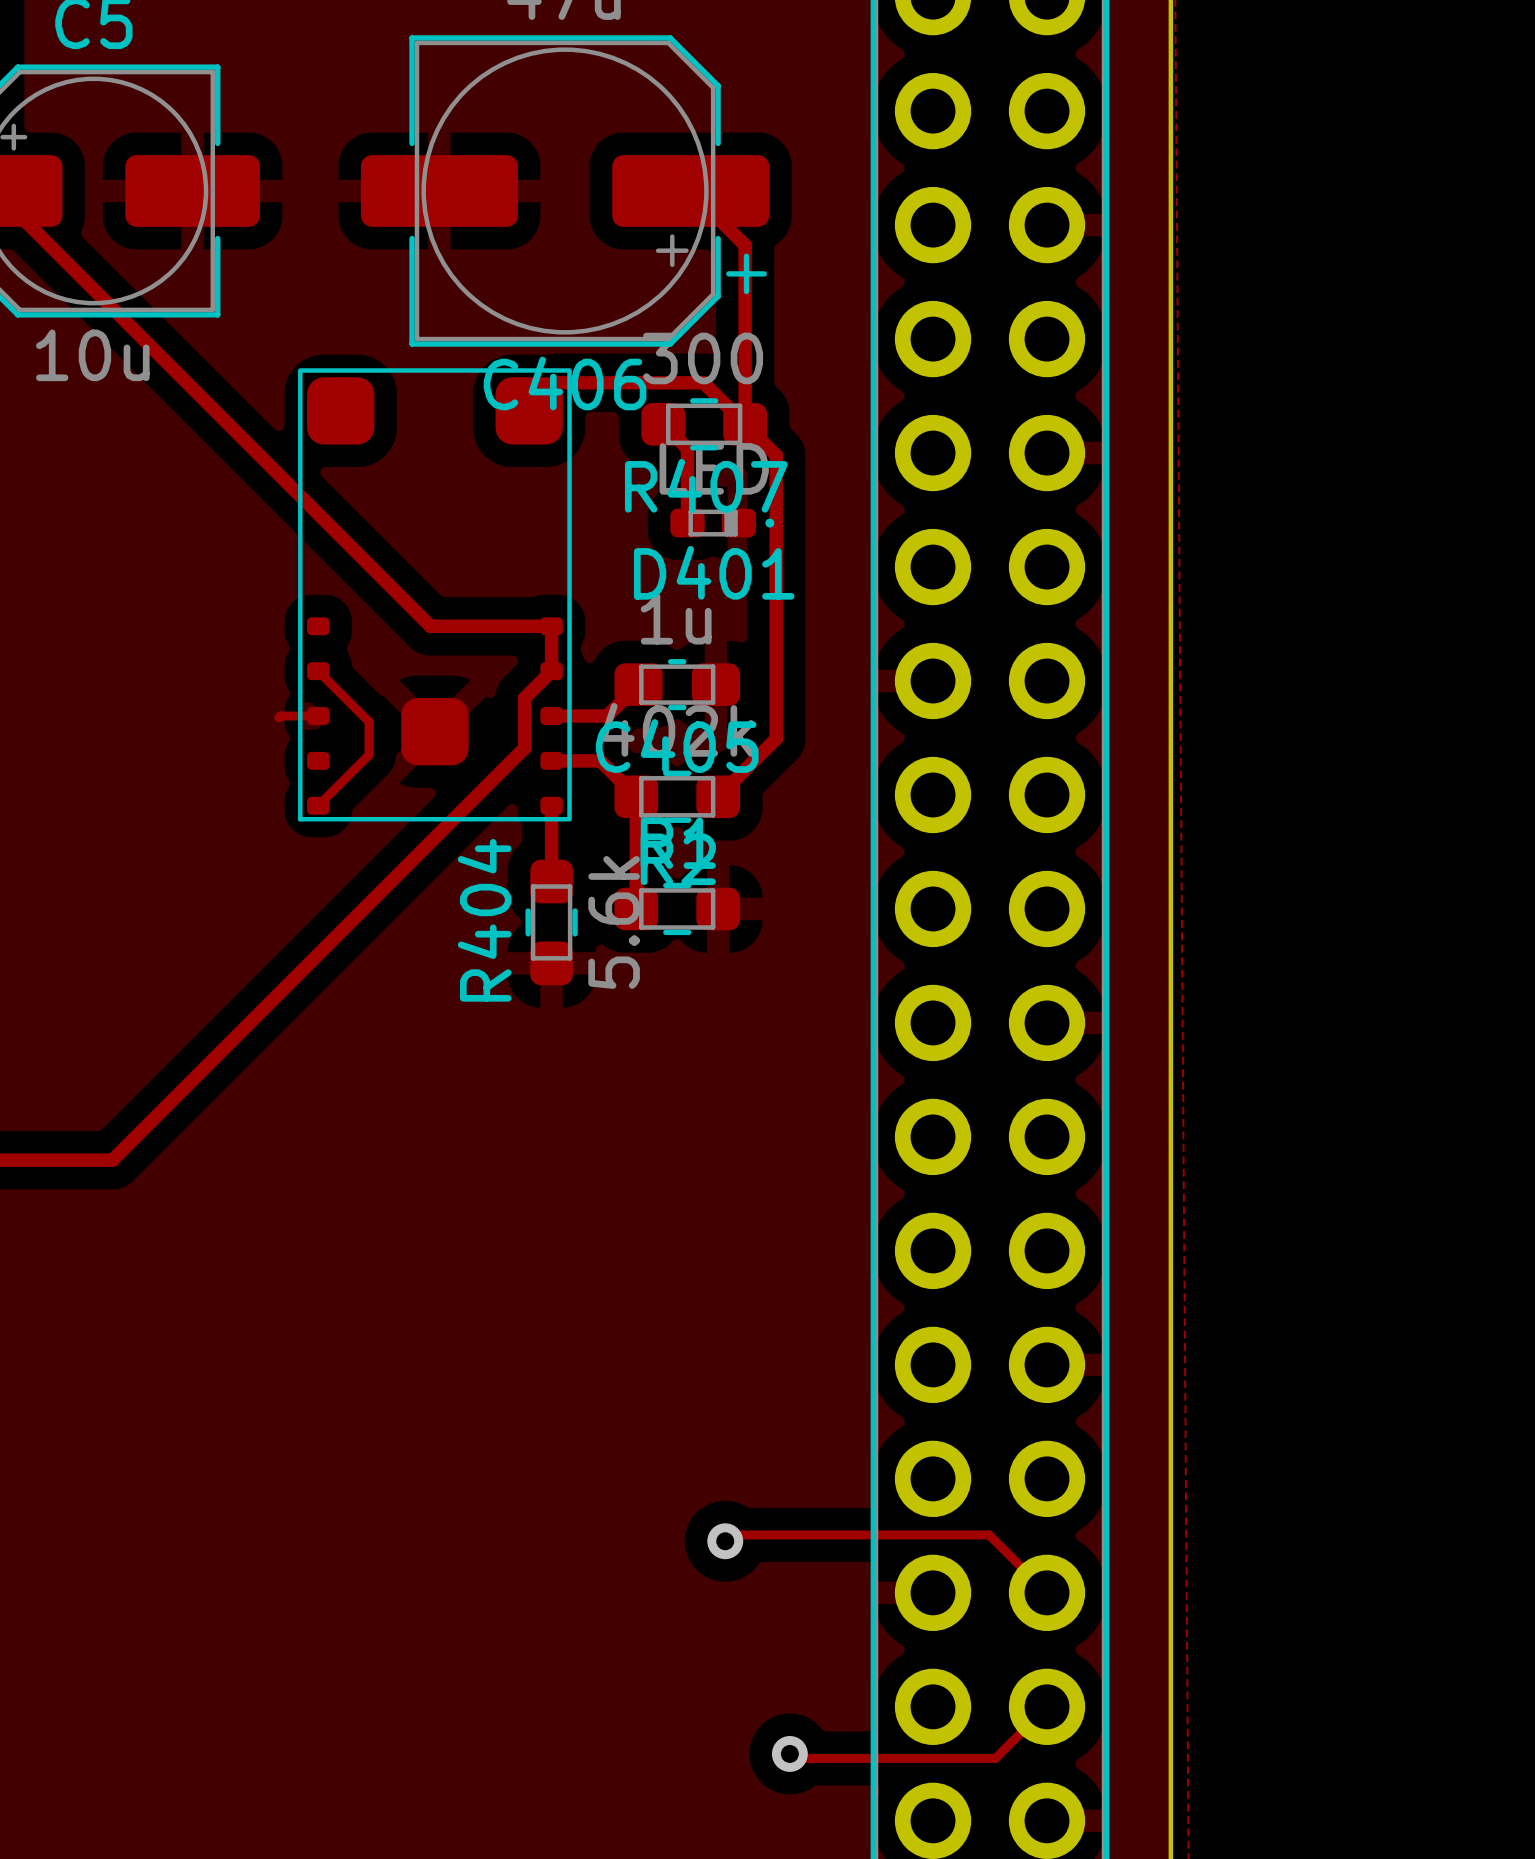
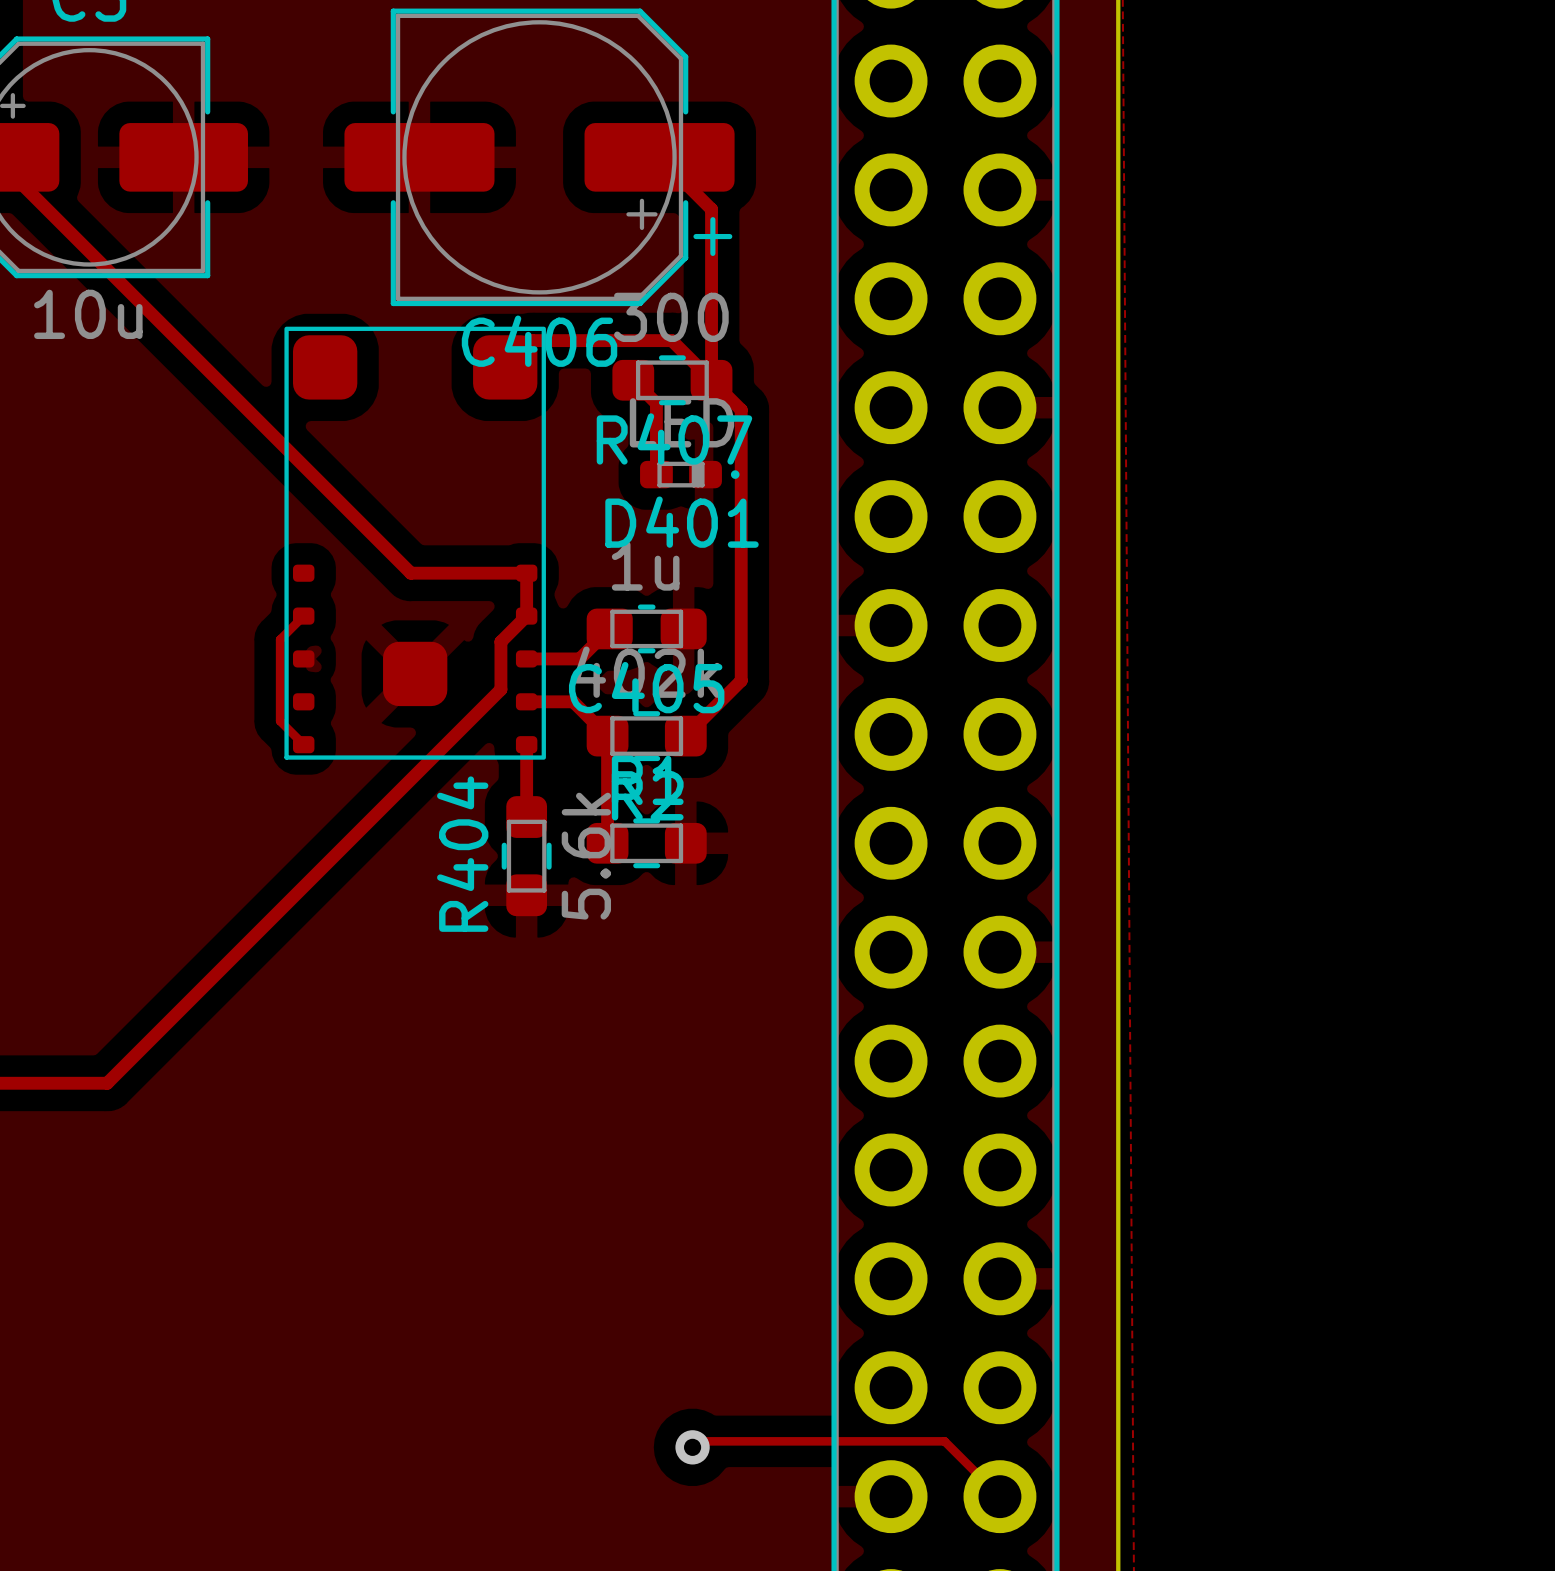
track: (318, 671) (368, 721) (368, 755) (318, 805) -> (303, 616) (280, 639) (280, 721) (303, 744)
track: (318, 716) (280, 716) (278, 717) -> none

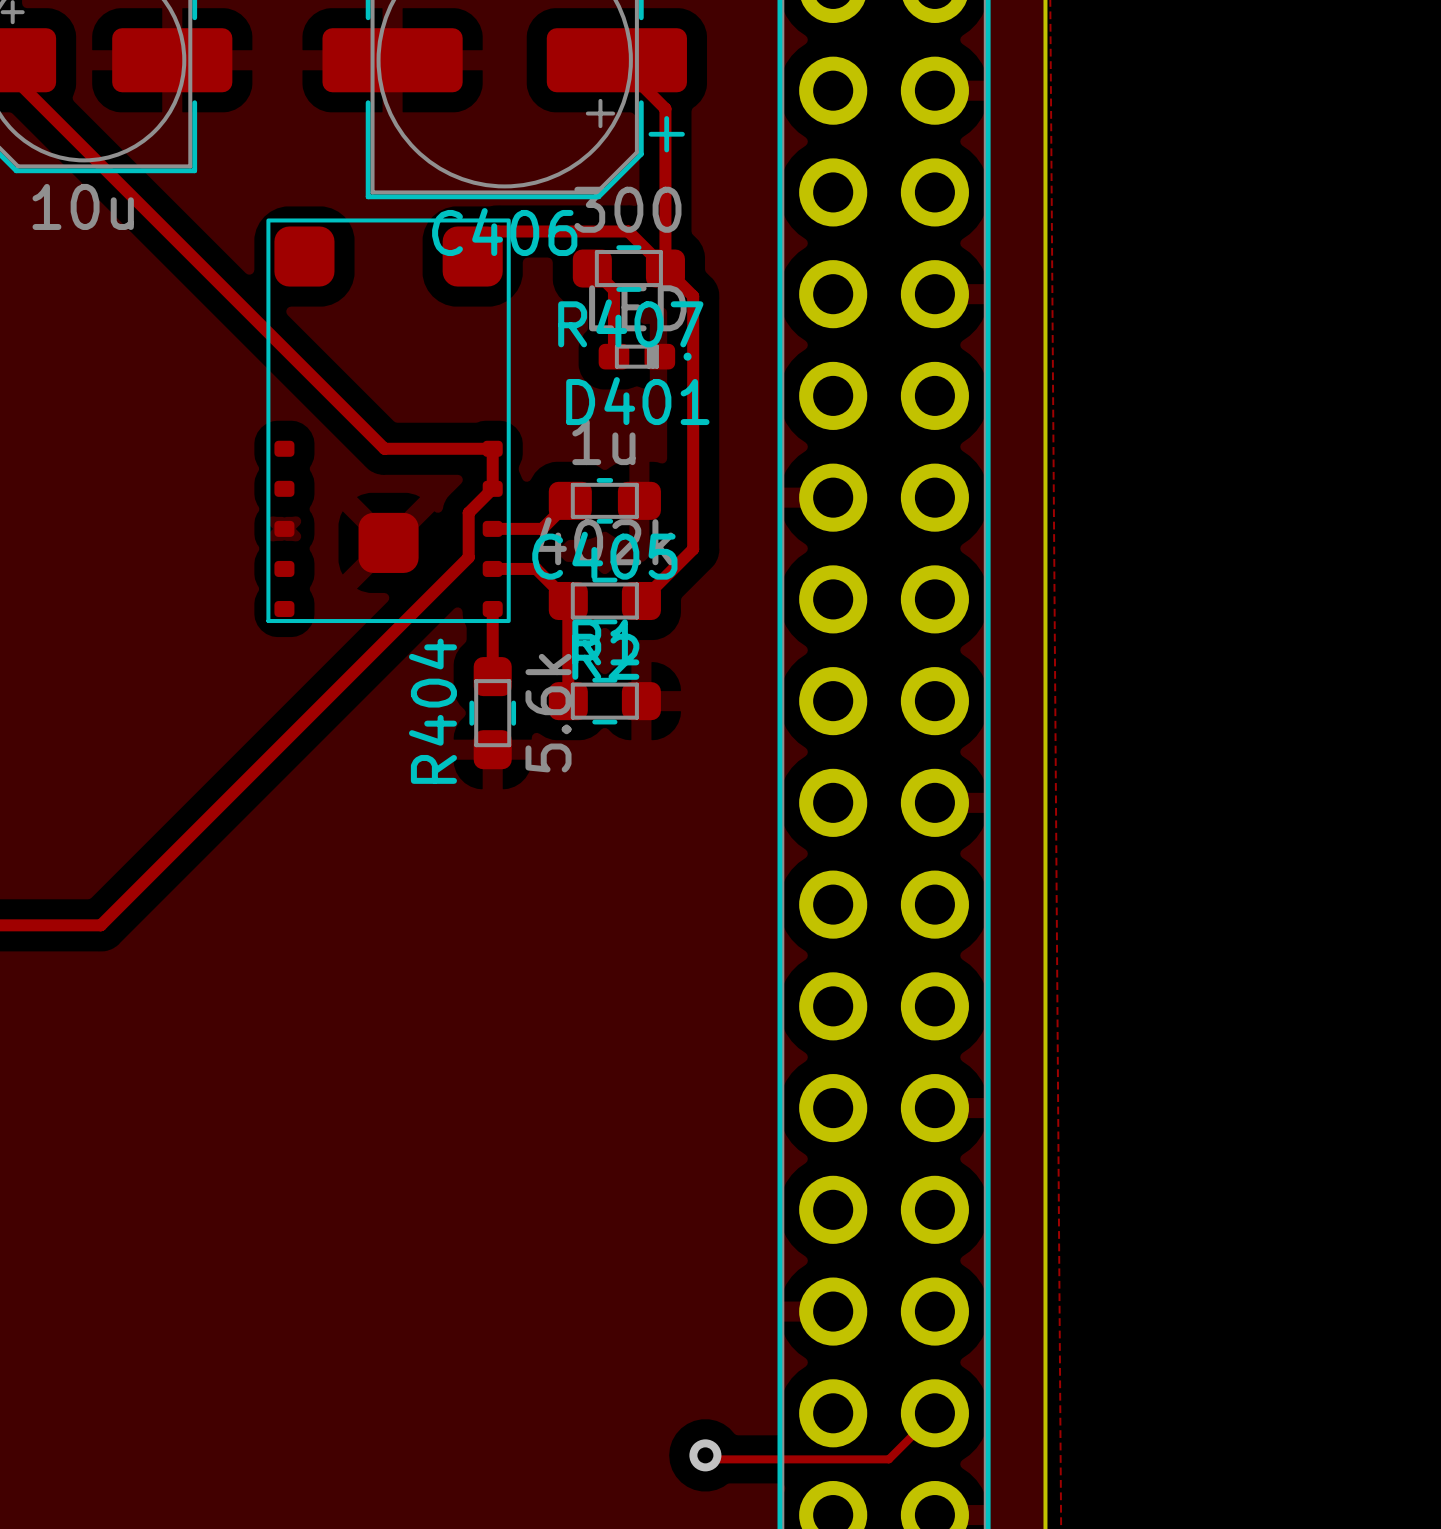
track: (303, 616) (280, 639) (280, 721) (303, 744) -> none
track: (692, 1447) (698, 1441) (944, 1441) (999, 1496) -> none
via: (692, 1447) -> none

